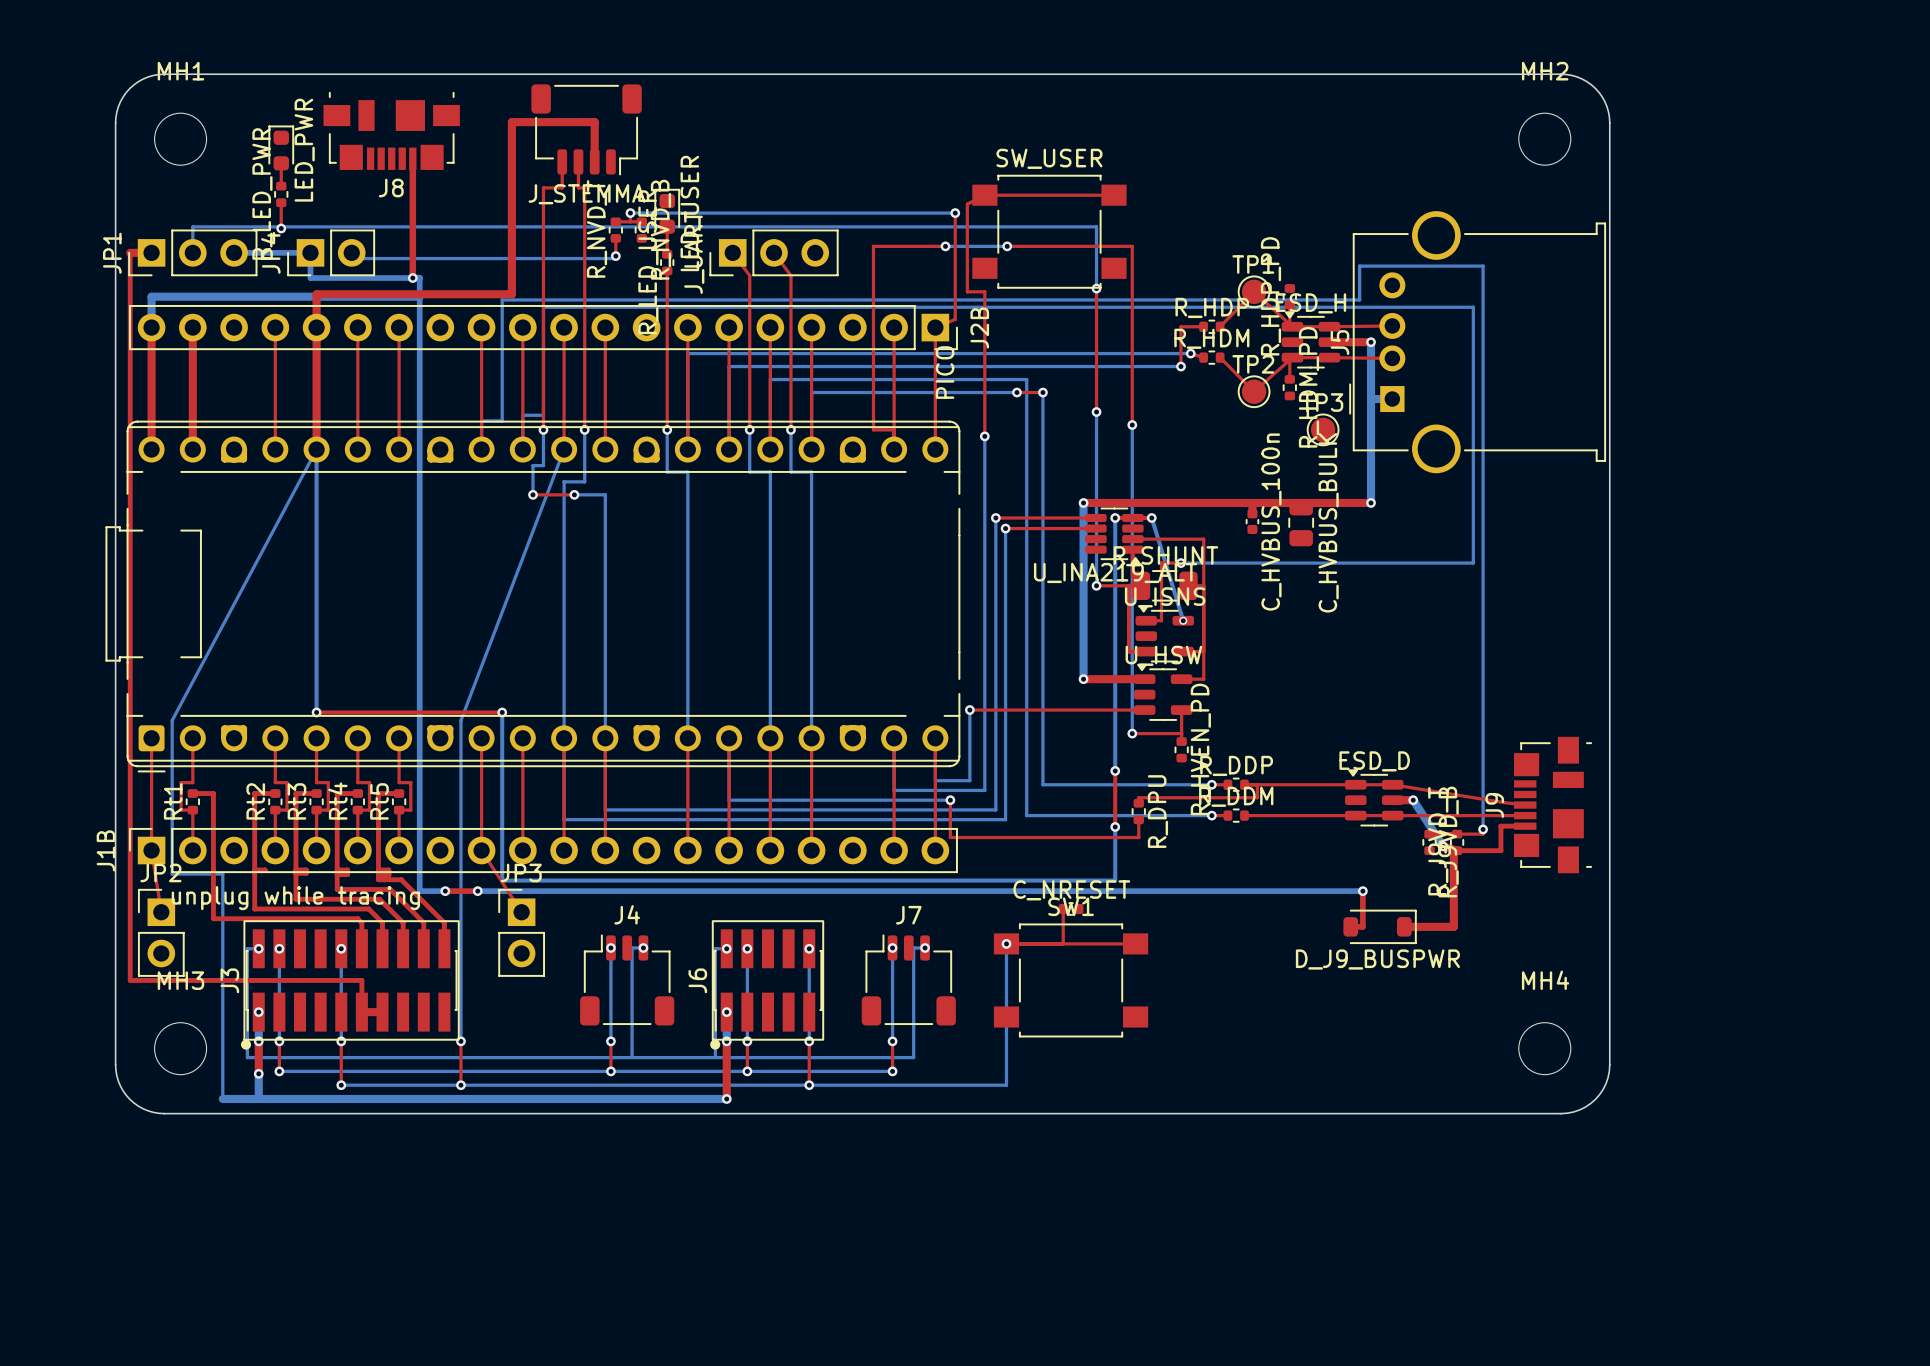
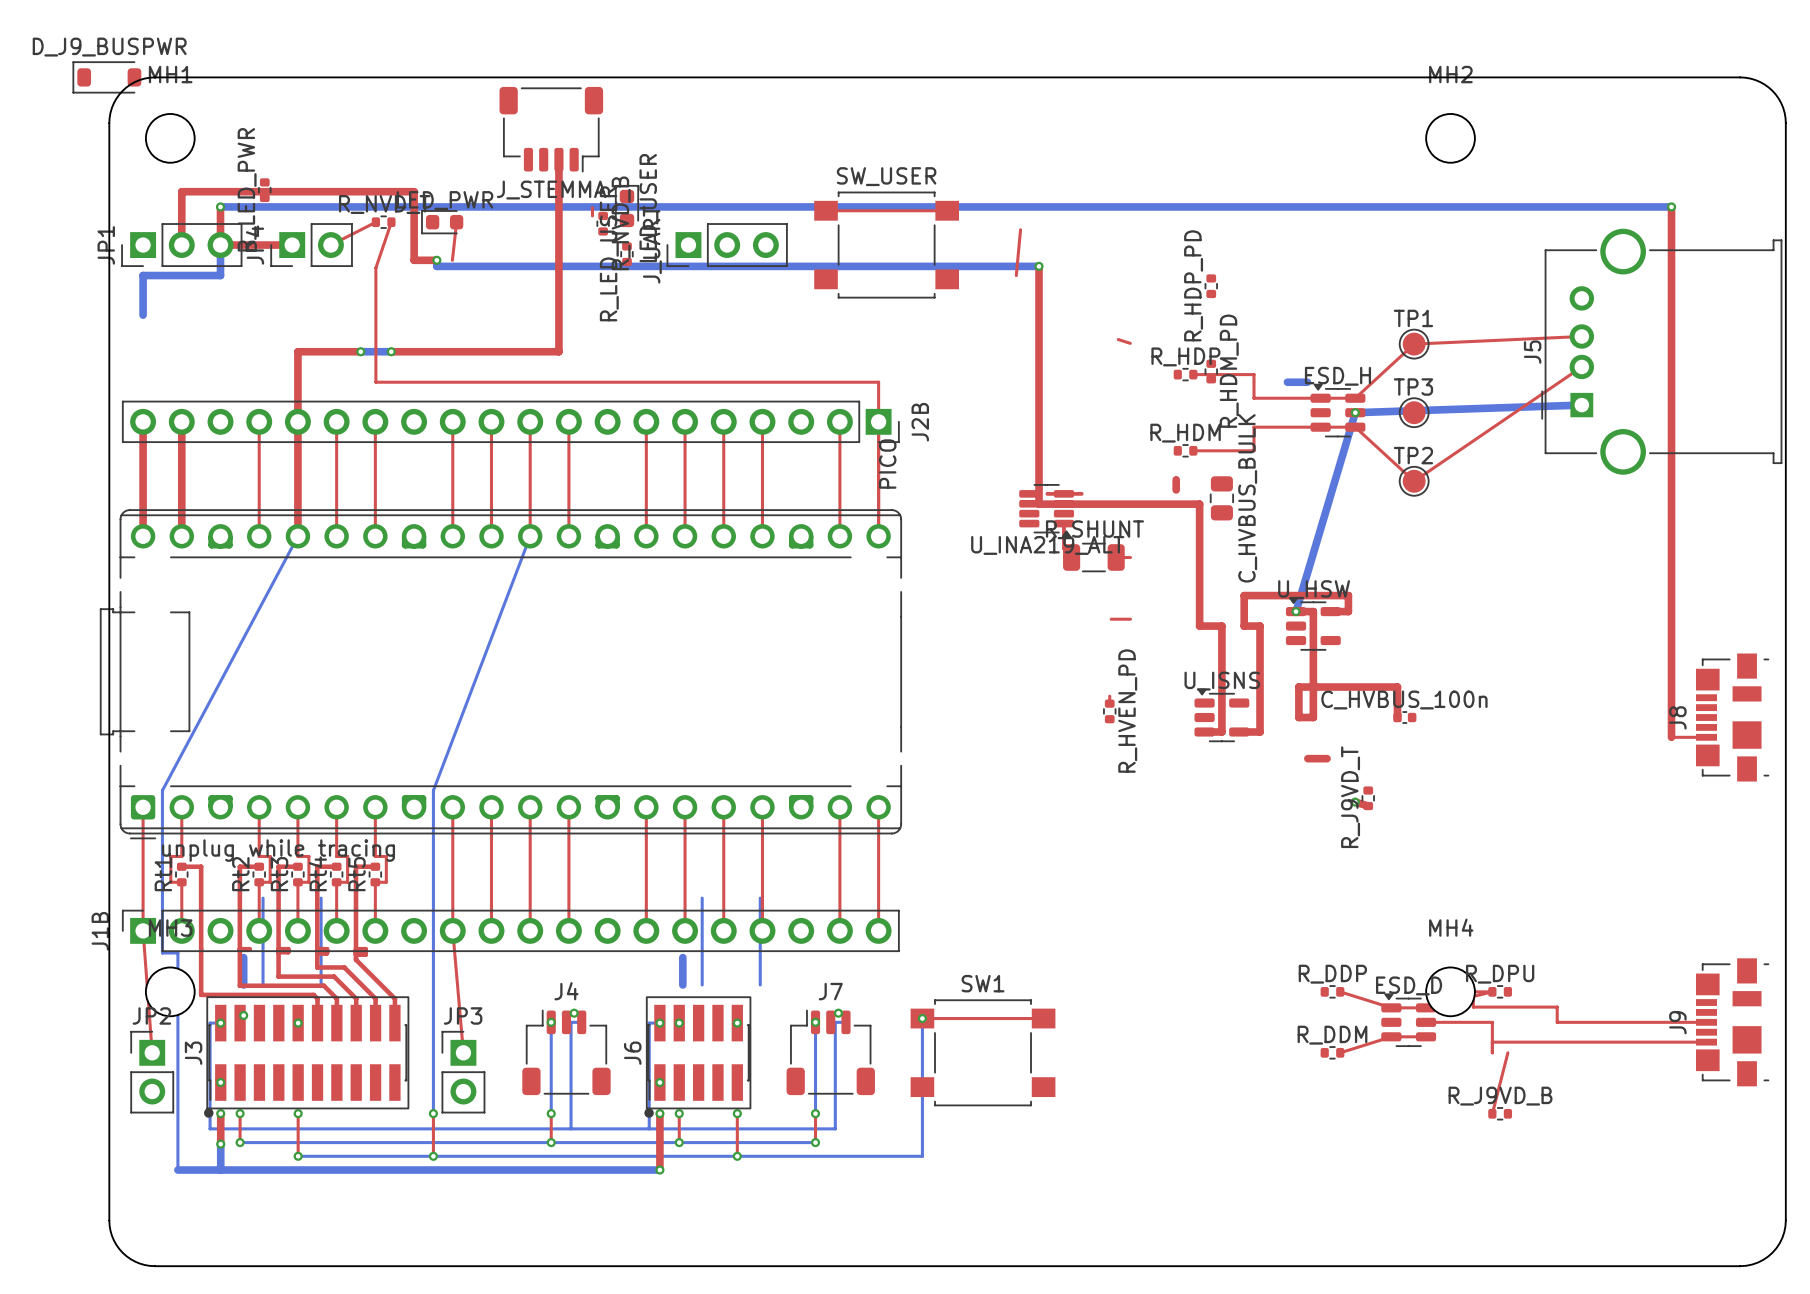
board edge: (1561, 74) (1582, 79) (1595, 88) (1604, 101) (1609, 122) (1609, 1064) (1608, 1077) (1603, 1089) (1590, 1103) (1573, 1111) (1561, 1113) (164, 1113) (143, 1108) (129, 1099) (118, 1080) (115, 1064) -> (1465, 77) (1745, 77) (1755, 79) (1768, 87) (1778, 98) (1784, 112) (1785, 1220) (1784, 1232) (1779, 1243) (1767, 1256) (1751, 1264) (1740, 1266) (149, 1265) (135, 1261) (122, 1252) (113, 1240) (109, 1225) (109, 1007)
J8 rotation: 0° (391, 130) -> 90° clockwise (1732, 717)
J8 position: (391, 130) -> (1732, 717)
LED_PWR rotation: 0° (281, 147) -> 90° counterclockwise (442, 222)
LED_PWR position: (281, 147) -> (442, 222)
top track: (412, 158) (412, 278) -> none
top track: (562, 161) (562, 187) (543, 187) (543, 429) -> none
top track: (578, 161) (578, 187) (584, 187) (584, 429) -> none
top track: (594, 161) (594, 122) (511, 122) (511, 294) (316, 294) (316, 366) -> (558, 159) (558, 351) (391, 351)
top track: (281, 163) (281, 186) -> none
top track: (1114, 195) (984, 195) (967, 204) (967, 291) (984, 291) (984, 436) -> none
top track: (281, 202) (281, 228) -> none
top track: none -> (220, 206) (220, 245) (292, 245)
bottom track: none -> (220, 206) (1671, 206)
top track: none -> (1671, 206) (1671, 737) (1706, 737)
via: none -> (1671, 206)
via: (630, 213) -> none
top track: (955, 213) (955, 319) (935, 327) (935, 399) -> (391, 222) (375, 267) (375, 382) (878, 382)
via: (955, 213) -> none
top track: none -> (826, 210) (947, 210)
top track: (615, 221) (641, 221) -> none
top track: (667, 226) (667, 254) -> none
via position: (281, 228) -> (220, 206)
top track: none -> (375, 222) (330, 245)
top track: none -> (456, 222) (452, 260)
R_NVD_T rotation: 0° (615, 230) -> 90° clockwise (383, 222)
R_NVD_T position: (615, 230) -> (383, 222)
SW_USER position: (1049, 231) -> (886, 245)
top track: none -> (1020, 229) (1016, 275)
top track: (615, 238) (615, 256) -> none
top track: (945, 246) (873, 246) (873, 429) (894, 429) -> none
bottom track: (945, 246) (1007, 246) -> none
via: (945, 246) -> none
top track: (1007, 246) (1132, 246) (1132, 425) -> none
via: (1007, 246) -> none
top track: (151, 252) (130, 252) (130, 980) (361, 980) (361, 1012) (382, 1012) -> none
top track: none -> (181, 245) (181, 191) (414, 191) (414, 260) (436, 260)
bottom track: (192, 252) (192, 226) (1096, 226) (1096, 288) -> none
bottom track: (234, 252) (310, 252) (310, 278) (419, 278) -> none
bottom track: (351, 252) (351, 258) (615, 258) (615, 256) -> none
top track: (732, 252) (749, 275) (749, 429) -> none
top track: (774, 252) (790, 275) (790, 429) -> none
via: (615, 256) -> none
bottom track: none -> (436, 260) (436, 266) (1039, 266)
via: none -> (436, 260)
top track: (667, 270) (667, 429) -> none
top track: none -> (1039, 266) (1039, 504) (1199, 504) (1199, 626) (1221, 626) (1221, 731) (1204, 731)
via: (412, 278) -> none
bottom track: (419, 278) (419, 891) (445, 891) -> none
top track: (1096, 288) (1096, 412) -> none
via position: (1096, 288) -> (1039, 266)
TP1 position: (1254, 291) -> (1414, 344)
bottom track: (151, 296) (419, 296) -> (143, 286) (143, 275) (220, 275) (220, 245)
top track: (1289, 305) (1289, 326) (1392, 325) -> none
top track: (1203, 326) (1181, 326) (1181, 366) -> none
R_HDP position: (1211, 326) -> (1185, 374)
top track: (1220, 326) (1254, 291) (1292, 326) -> none
top track: (151, 327) (151, 441) -> (143, 429) (143, 536)
top track: (192, 327) (192, 441) -> (181, 429) (181, 536)
top track: (275, 327) (275, 441) -> (259, 429) (259, 536)
top track: (357, 327) (357, 441) -> (336, 429) (336, 536)
top track: (399, 327) (399, 441) -> (375, 429) (375, 536)
top track: (481, 327) (481, 441) -> (452, 429) (452, 536)
top track: (522, 327) (522, 441) -> (491, 429) (491, 536)
J2B position: (543, 327) -> (510, 421)
top track: (564, 327) (564, 441) -> (530, 429) (530, 536)
top track: (605, 327) (605, 441) -> (568, 429) (568, 536)
top track: (687, 327) (687, 441) -> (646, 429) (646, 536)
top track: (729, 327) (729, 441) -> (685, 429) (685, 536)
top track: (770, 327) (770, 441) -> (723, 429) (723, 536)
top track: (811, 327) (811, 441) -> (762, 429) (762, 536)
top track: (894, 327) (894, 441) -> (839, 429) (839, 536)
ESD_H position: (1310, 339) -> (1337, 410)
top track: (1329, 342) (1371, 342) -> none
bottom track: (1371, 342) (1371, 502) -> none
via: (1371, 342) -> none
J5 position: (1477, 342) -> (1661, 351)
top track: none -> (1581, 336) (1414, 344) (1355, 398) (1253, 398) (1253, 374) (1193, 374)
bottom track: (1190, 353) (687, 353) (687, 449) -> none
via: (1190, 353) -> none
R_HDM position: (1211, 357) -> (1185, 450)
top track: (1220, 357) (1254, 391) (1292, 357) -> none
top track: (1392, 358) (1289, 357) (1289, 379) -> none
top track: none -> (297, 351) (360, 351)
bottom track: none -> (360, 351) (391, 351)
via: none -> (360, 351)
via: none -> (391, 351)
bottom track: (1181, 366) (729, 366) (729, 449) -> none
via: (1181, 366) -> none
top track: none -> (1581, 366) (1414, 481) (1355, 427) (1253, 427) (1253, 450) (1193, 450)
TP2 position: (1254, 391) -> (1414, 481)
top track: (1016, 392) (1042, 392) -> none
bottom track: (1016, 392) (811, 392) (811, 449) -> none
via: (1016, 392) -> none
bottom track: (1042, 392) (1042, 784) (1211, 784) -> none
via: (1042, 392) -> none
bottom track: (1096, 412) (1096, 585) -> none
via: (1096, 412) -> none
bottom track: none -> (1581, 405) (1355, 412) (1296, 611)
bottom track: (1132, 425) (1132, 733) -> none
via: (1132, 425) -> none
bottom track: (543, 429) (543, 465) (532, 465) (532, 494) -> none
via: (543, 429) -> none
bottom track: (584, 429) (584, 481) (564, 481) (564, 819) (1005, 819) (1005, 528) -> none
via: (584, 429) -> none
bottom track: (667, 429) (667, 472) (687, 472) (687, 738) -> none
via: (667, 429) -> none
bottom track: (749, 429) (749, 472) (770, 472) (770, 738) -> none
via: (749, 429) -> none
bottom track: (790, 429) (790, 472) (811, 472) (811, 738) -> none
via: (790, 429) -> none
TP3 position: (1323, 429) -> (1414, 412)
via: none -> (1355, 412)
bottom track: (984, 436) (984, 790) (894, 790) (894, 738) -> none
via: (984, 436) -> none
top track: none -> (297, 429) (297, 536)
bottom track: (481, 449) (481, 420) (502, 420) (502, 299) (1359, 299) (1359, 266) (1483, 266) (1483, 829) -> none
bottom track: (522, 449) (522, 415) (543, 415) (543, 307) (1473, 307) (1473, 563) (1181, 563) -> none
bottom track: (564, 449) (460, 720) (460, 834) -> (530, 536) (433, 790)
bottom track: (770, 449) (770, 379) (1026, 379) (1026, 815) (1211, 815) -> none
top track: none -> (878, 429) (878, 536)
top track: (532, 494) (574, 494) -> none
via: (532, 494) -> none
bottom track: (574, 494) (605, 494) (605, 809) (995, 809) (995, 517) -> none
via: (574, 494) -> none
top track: (1083, 502) (1371, 502) -> none
bottom track: (1083, 502) (1083, 679) -> none
via: (1083, 502) -> none
via: (1371, 502) -> none
top track: (995, 517) (1095, 517) -> none
via: (995, 517) -> none
bottom track: (1115, 517) (1115, 770) -> none
via: (1115, 517) -> none
bottom track: (1151, 517) (1183, 620) -> none
via: (1151, 517) -> none
C_HVBUS_100n rotation: 0° (1252, 521) -> 90° clockwise (1404, 717)
C_HVBUS_100n position: (1252, 521) -> (1404, 717)
top track: (1005, 528) (1095, 528) -> none
via: (1005, 528) -> none
top track: (1132, 539) (1203, 539) (1203, 679) (1181, 679) -> none
top track: (1181, 563) (1161, 563) (1161, 620) (1146, 620) -> none
via: (1181, 563) -> none
top track: (1096, 585) (1141, 585) (1129, 585) (1129, 651) (1146, 651) -> none
via: (1096, 585) -> none
PICO position: (532, 596) -> (500, 674)
via: (1183, 620) -> none
U_ISNS position: (1164, 633) -> (1221, 715)
top track: none -> (1296, 611) (1313, 611) (1313, 717) (1298, 717) (1298, 687) (1397, 687) (1397, 717)
via: none -> (1296, 611)
top track: none -> (1330, 611) (1348, 611) (1348, 595) (1244, 595) (1244, 626) (1260, 626) (1260, 731) (1239, 731)
top track: (1083, 679) (1144, 679) -> none
via: (1083, 679) -> none
U_HSW position: (1163, 692) -> (1313, 623)
top track: (969, 710) (1144, 710) -> none
bottom track: (969, 710) (969, 780) (935, 780) (935, 738) -> none
via: (969, 710) -> none
top track: (1181, 710) (1181, 733) (1132, 733) -> none
top track: (316, 712) (502, 712) -> none
bottom track: (316, 712) (316, 449) (172, 720) (172, 834) -> (297, 536) (162, 790)
via: (316, 712) -> none
bottom track: (502, 712) (502, 880) (1115, 880) (1115, 826) -> none
via: (502, 712) -> none
via: (1132, 733) -> none
top track: (151, 738) (151, 850) (161, 912) -> none
top track: (192, 738) (192, 782) (181, 782) (181, 810) (192, 810) (192, 850) -> none
top track: (275, 738) (275, 782) (287, 782) (287, 810) (275, 810) (275, 850) -> none
top track: (316, 738) (316, 782) (328, 782) (328, 810) (316, 810) (316, 850) -> none
top track: (357, 738) (357, 782) (369, 782) (369, 810) (357, 810) (357, 850) -> none
top track: (399, 738) (399, 782) (410, 782) (410, 810) (399, 810) (399, 850) -> none
top track: (481, 738) (481, 850) (521, 912) -> none
top track: (522, 738) (522, 850) -> none
top track: (564, 738) (564, 850) -> none
top track: (605, 738) (605, 850) -> none
top track: (687, 738) (687, 850) -> none
top track: (729, 738) (729, 850) -> none
bottom track: (729, 738) (729, 800) (950, 800) -> none
top track: (770, 738) (770, 850) -> none
top track: (811, 738) (811, 850) -> none
top track: (894, 738) (894, 850) -> none
top track: (935, 738) (935, 850) -> none
top track: (1115, 770) (1115, 826) -> none
via: (1115, 770) -> none
top track: (1211, 784) (1227, 784) -> none
via: (1211, 784) -> none
R_DDP position: (1236, 784) -> (1332, 991)
top track: (1244, 784) (1392, 784) (1525, 805) -> none
top track: (1257, 784) (1257, 797) (1138, 797) (1138, 803) -> none
top track: (192, 793) (213, 793) (213, 915) -> (181, 866) (201, 866)
top track: (275, 793) (254, 793) (254, 870) (265, 870) (254, 870) (254, 908) (368, 908) (382, 922) (382, 948) -> none
top track: (316, 793) (295, 793) (295, 870) (306, 870) (295, 870) (306, 871) (295, 871) (306, 872) (295, 873) (295, 899) (379, 899) (403, 922) (403, 948) -> none
top track: (357, 793) (337, 793) (337, 870) (347, 870) (337, 870) (347, 871) (337, 871) (347, 872) (337, 873) (347, 873) (337, 874) (337, 889) (390, 889) (423, 922) (423, 948) -> none
top track: (399, 793) (378, 793) (378, 870) (388, 870) (378, 870) (388, 871) (378, 871) (388, 872) (378, 873) (388, 873) (378, 874) (388, 875) (378, 875) (378, 879) (401, 879) (444, 922) (444, 948) -> none
ESD_D position: (1374, 797) -> (1408, 1020)
top track: (950, 800) (950, 837) (1138, 837) (1138, 819) -> none
via: (950, 800) -> none
bottom track: (1413, 800) (1443, 846) -> none
via: (1413, 800) -> none
Rt1 position: (192, 801) -> (181, 874)
Rt2 position: (275, 801) -> (259, 874)
Rt3 position: (316, 801) -> (297, 874)
Rt4 position: (357, 801) -> (336, 874)
Rt5 position: (399, 801) -> (375, 874)
J9 position: (1553, 805) -> (1732, 1022)
R_DPU: (1138, 811) -> none
top track: (1211, 815) (1227, 815) -> none
via: (1211, 815) -> none
R_DDM position: (1236, 815) -> (1332, 1052)
top track: (1244, 815) (1525, 815) -> none
via: (1115, 826) -> none
top track: (1525, 826) (1500, 826) (1500, 850) (1453, 850) (1453, 926) (1404, 926) -> none
top track: (1483, 829) (1483, 834) (1429, 834) -> none
via: (1483, 829) -> none
R_J9VD_B rotation: 0° (1429, 842) -> 90° clockwise (1500, 1113)
R_J9VD_B position: (1429, 842) -> (1500, 1113)
J1B position: (543, 850) -> (510, 930)
top track: none -> (143, 807) (143, 930) (152, 1052)
top track: none -> (181, 807) (181, 856) (170, 856) (170, 882) (181, 882) (181, 930)
top track: none -> (259, 807) (259, 856) (270, 856) (270, 882) (259, 882) (259, 930)
top track: none -> (297, 807) (297, 856) (308, 856) (308, 882) (297, 882) (297, 930)
top track: none -> (336, 807) (336, 856) (347, 856) (347, 882) (336, 882) (336, 930)
top track: none -> (375, 807) (375, 856) (386, 856) (386, 882) (375, 882) (375, 930)
top track: none -> (452, 807) (452, 930) (463, 1052)
top track: none -> (491, 807) (491, 930)
top track: none -> (530, 807) (530, 930)
top track: none -> (568, 807) (568, 930)
top track: none -> (646, 807) (646, 930)
top track: none -> (685, 807) (685, 930)
top track: none -> (723, 807) (723, 930)
top track: none -> (762, 807) (762, 930)
top track: none -> (839, 807) (839, 930)
top track: none -> (878, 807) (878, 930)
bottom track: (172, 874) (222, 874) (222, 1099) (726, 1099) -> (162, 828) (162, 952) (177, 952) (177, 1170) (659, 1170)
top track: (445, 891) (477, 891) -> none
via: (445, 891) -> none
bottom track: (477, 891) (1362, 891) -> none
via: (477, 891) -> none
top track: (1362, 891) (1362, 926) (1350, 926) -> none
via: (1362, 891) -> none
top track: (1063, 908) (1063, 943) -> none
C_NRESET: (1071, 908) -> none
top track: none -> (259, 866) (239, 866) (239, 949) (249, 949) (239, 949) (239, 985) (323, 985) (336, 998) (336, 1023)
top track: none -> (297, 866) (278, 866) (278, 949) (288, 949) (278, 949) (288, 950) (278, 951) (288, 951) (278, 952) (278, 976) (334, 976) (356, 998) (356, 1023)
top track: none -> (336, 866) (317, 866) (317, 949) (326, 949) (317, 949) (326, 950) (317, 951) (326, 951) (317, 952) (326, 952) (317, 953) (317, 967) (344, 967) (375, 998) (375, 1023)
top track: none -> (375, 866) (356, 866) (356, 949) (365, 949) (356, 949) (365, 950) (356, 951) (365, 951) (356, 952) (365, 952) (356, 953) (365, 954) (356, 954) (356, 959) (394, 998) (394, 1023)
top track: (213, 918) (357, 918) (361, 922) (361, 948) -> (201, 869) (201, 994) (313, 994) (317, 998) (317, 1023)
D_J9_BUSPWR rotation: 0° (1380, 926) -> 180° (106, 77)
D_J9_BUSPWR position: (1380, 926) -> (106, 77)
JP2 position: (161, 932) -> (152, 1072)
JP3 position: (521, 932) -> (463, 1072)
top track: (1006, 943) (1135, 943) -> (922, 1018) (1043, 1018)
bottom track: (1006, 943) (1006, 1085) (341, 1085) -> none
via: (1006, 943) -> none
bottom track: (610, 947) (610, 1041) -> none
via: (610, 947) -> none
bottom track: (643, 947) (632, 947) (632, 1057) -> none
via: (643, 947) -> none
bottom track: (892, 947) (892, 1041) -> none
via: (892, 947) -> none
bottom track: (925, 947) (913, 947) (913, 1057) (247, 1057) (247, 948) (258, 948) -> none
via: (925, 947) -> none
via: (258, 948) -> none
via: (279, 948) -> none
via: (341, 948) -> none
bottom track: (726, 948) (715, 948) (715, 1057) -> none
via: (726, 948) -> none
via: (747, 948) -> none
via: (809, 948) -> none
J4 position: (627, 979) -> (566, 1052)
J7 position: (908, 979) -> (830, 1052)
SW1 position: (1071, 980) -> (983, 1052)
J3 position: (350, 984) -> (306, 1057)
J6 position: (767, 984) -> (697, 1057)
via: (258, 1012) -> none
via: (726, 1012) -> none
top track: (258, 1041) (258, 1073) -> (220, 1113) (220, 1144)
via: (258, 1041) -> none
top track: (279, 1041) (279, 1071) -> none
via: (279, 1041) -> none
top track: (341, 1041) (341, 1085) -> none
via: (341, 1041) -> none
top track: (460, 1041) (460, 1085) -> none
bottom track: none -> (433, 984) (433, 1113)
via: (460, 1041) -> none
top track: (610, 1041) (610, 1071) -> none
via position: (610, 1041) -> (551, 1022)
top track: (726, 1041) (726, 1099) -> none
via: (726, 1041) -> none
top track: (747, 1041) (747, 1071) -> none
via: (747, 1041) -> none
top track: (809, 1041) (809, 1085) -> none
via: (809, 1041) -> none
top track: (892, 1041) (892, 1071) -> none
via: (892, 1041) -> none
top track: none -> (1340, 991) (1391, 1007) (1426, 1007) (1492, 991) (1473, 991) (1473, 1007) (1557, 1007) (1557, 1022) (1706, 1022)
R_DPU: none -> (1500, 991)
bottom track: (279, 1071) (892, 1071) -> (240, 1142) (815, 1142)
via: (279, 1071) -> none
via: (747, 1071) -> none
bottom track: (258, 1073) (258, 1099) -> none
bottom track: none -> (922, 1018) (922, 1156) (298, 1156)
via: none -> (922, 1018)
via: none -> (220, 1023)
via: none -> (298, 1023)
bottom track: none -> (551, 1022) (551, 1113)
bottom track: none -> (581, 1022) (571, 1022) (571, 1128)
bottom track: none -> (659, 1023) (649, 1023) (649, 1128)
via: none -> (659, 1023)
via: none -> (679, 1023)
via: none -> (737, 1023)
bottom track: none -> (815, 1022) (815, 1113)
via: none -> (815, 1022)
bottom track: none -> (845, 1022) (835, 1022) (835, 1128) (210, 1128) (210, 1023) (220, 1023)
top track: none -> (1426, 1022) (1492, 1022) (1492, 1052)
via: (341, 1085) -> none
via: (460, 1085) -> none
via: (809, 1085) -> none
top track: none -> (1426, 1036) (1391, 1036) (1340, 1052)
via: (726, 1099) -> none
top track: none -> (1492, 1042) (1706, 1042)
top track: none -> (1507, 1052) (1492, 1113)
via: none -> (220, 1082)
via: none -> (659, 1082)
via: none -> (220, 1113)
top track: none -> (240, 1113) (240, 1142)
via: none -> (240, 1113)
top track: none -> (298, 1113) (298, 1156)
via: none -> (298, 1113)
top track: none -> (433, 1113) (433, 1156)
via: none -> (433, 1113)
top track: none -> (551, 1113) (551, 1142)
via: none -> (551, 1113)
top track: none -> (659, 1113) (659, 1170)
via: none -> (659, 1113)
top track: none -> (679, 1113) (679, 1142)
via: none -> (679, 1113)
top track: none -> (737, 1113) (737, 1156)
via: none -> (737, 1113)
top track: none -> (815, 1113) (815, 1142)
via: none -> (815, 1113)
via: none -> (240, 1142)
via: none -> (551, 1142)
via: none -> (679, 1142)
via: none -> (815, 1142)
bottom track: none -> (220, 1144) (220, 1170)
via: none -> (220, 1144)
via: none -> (298, 1156)
via: none -> (433, 1156)
via: none -> (737, 1156)
via: none -> (659, 1170)

